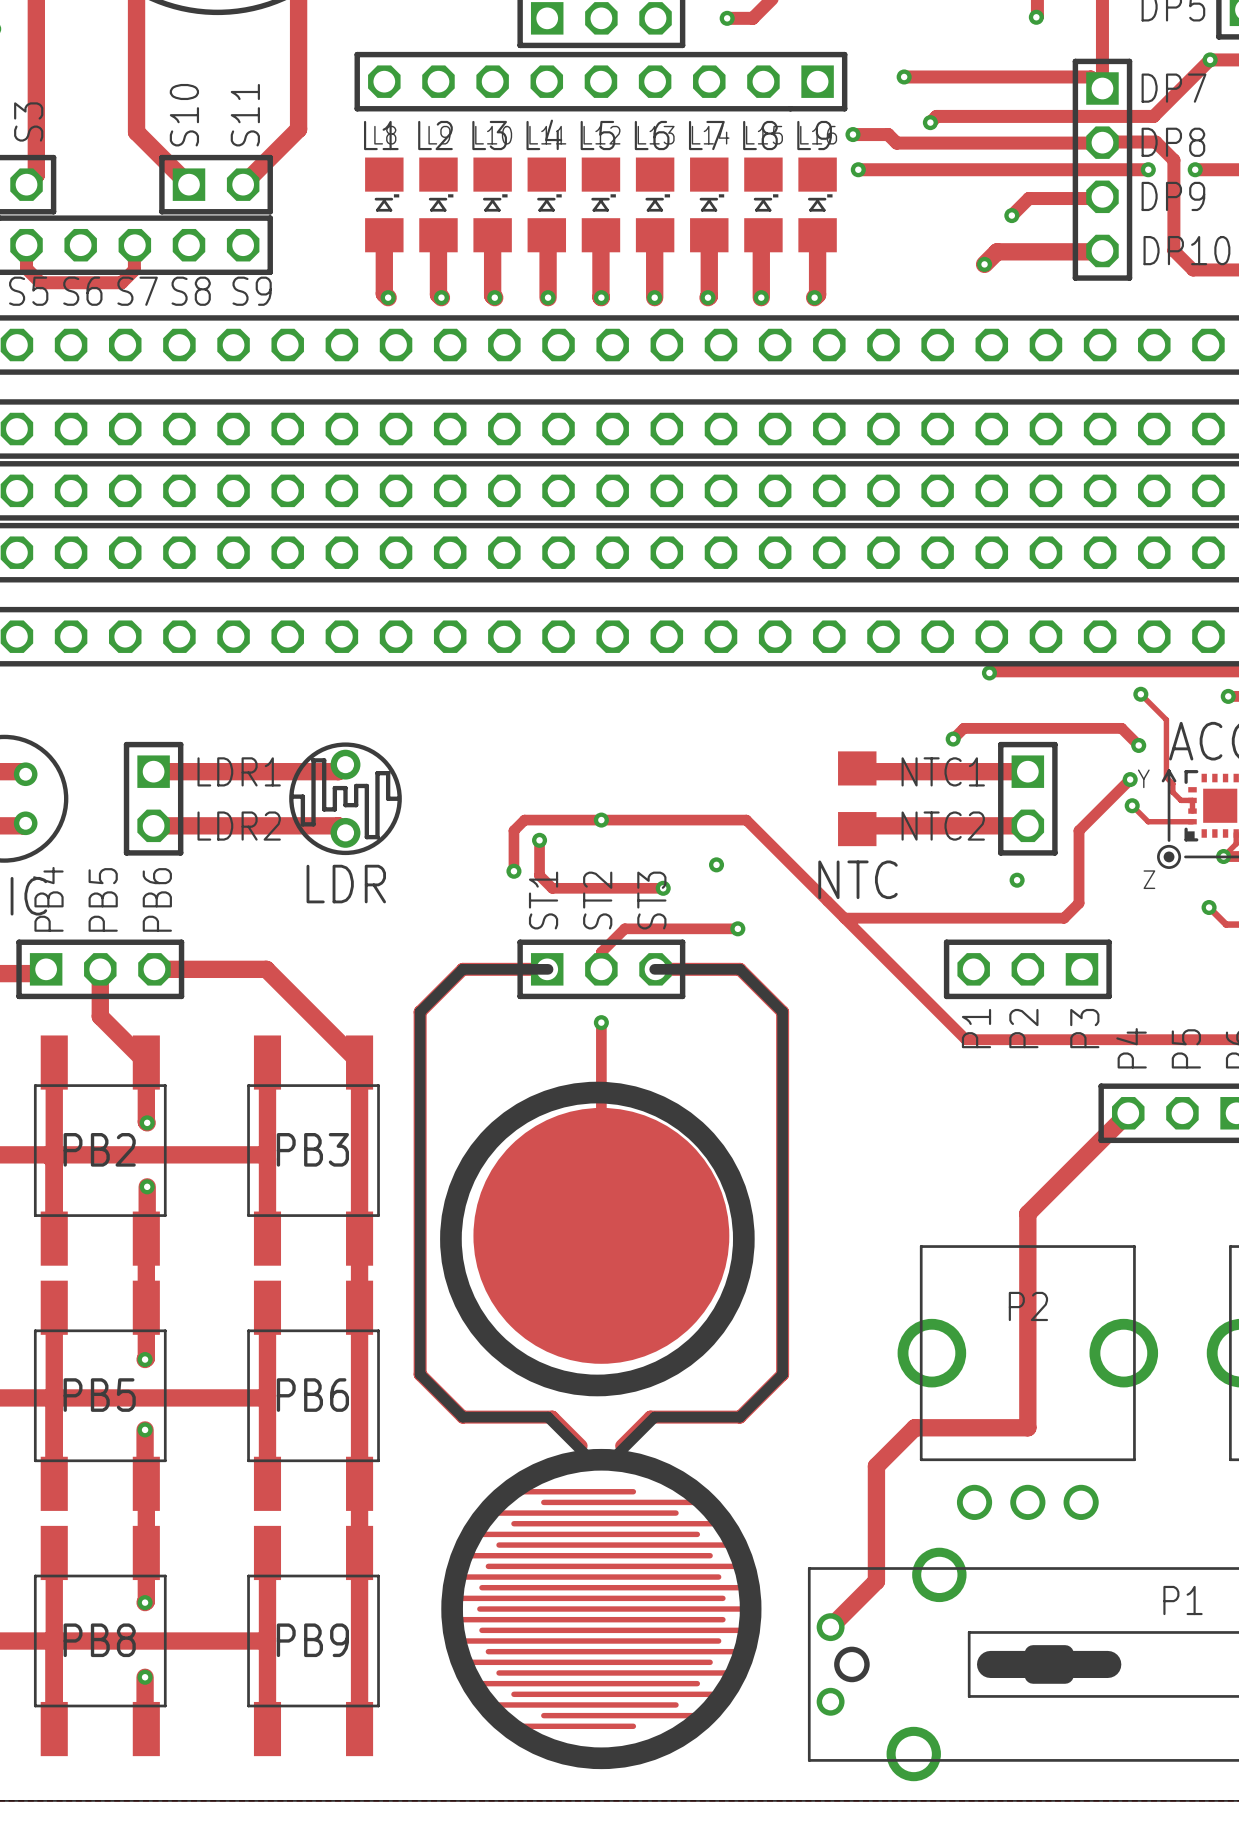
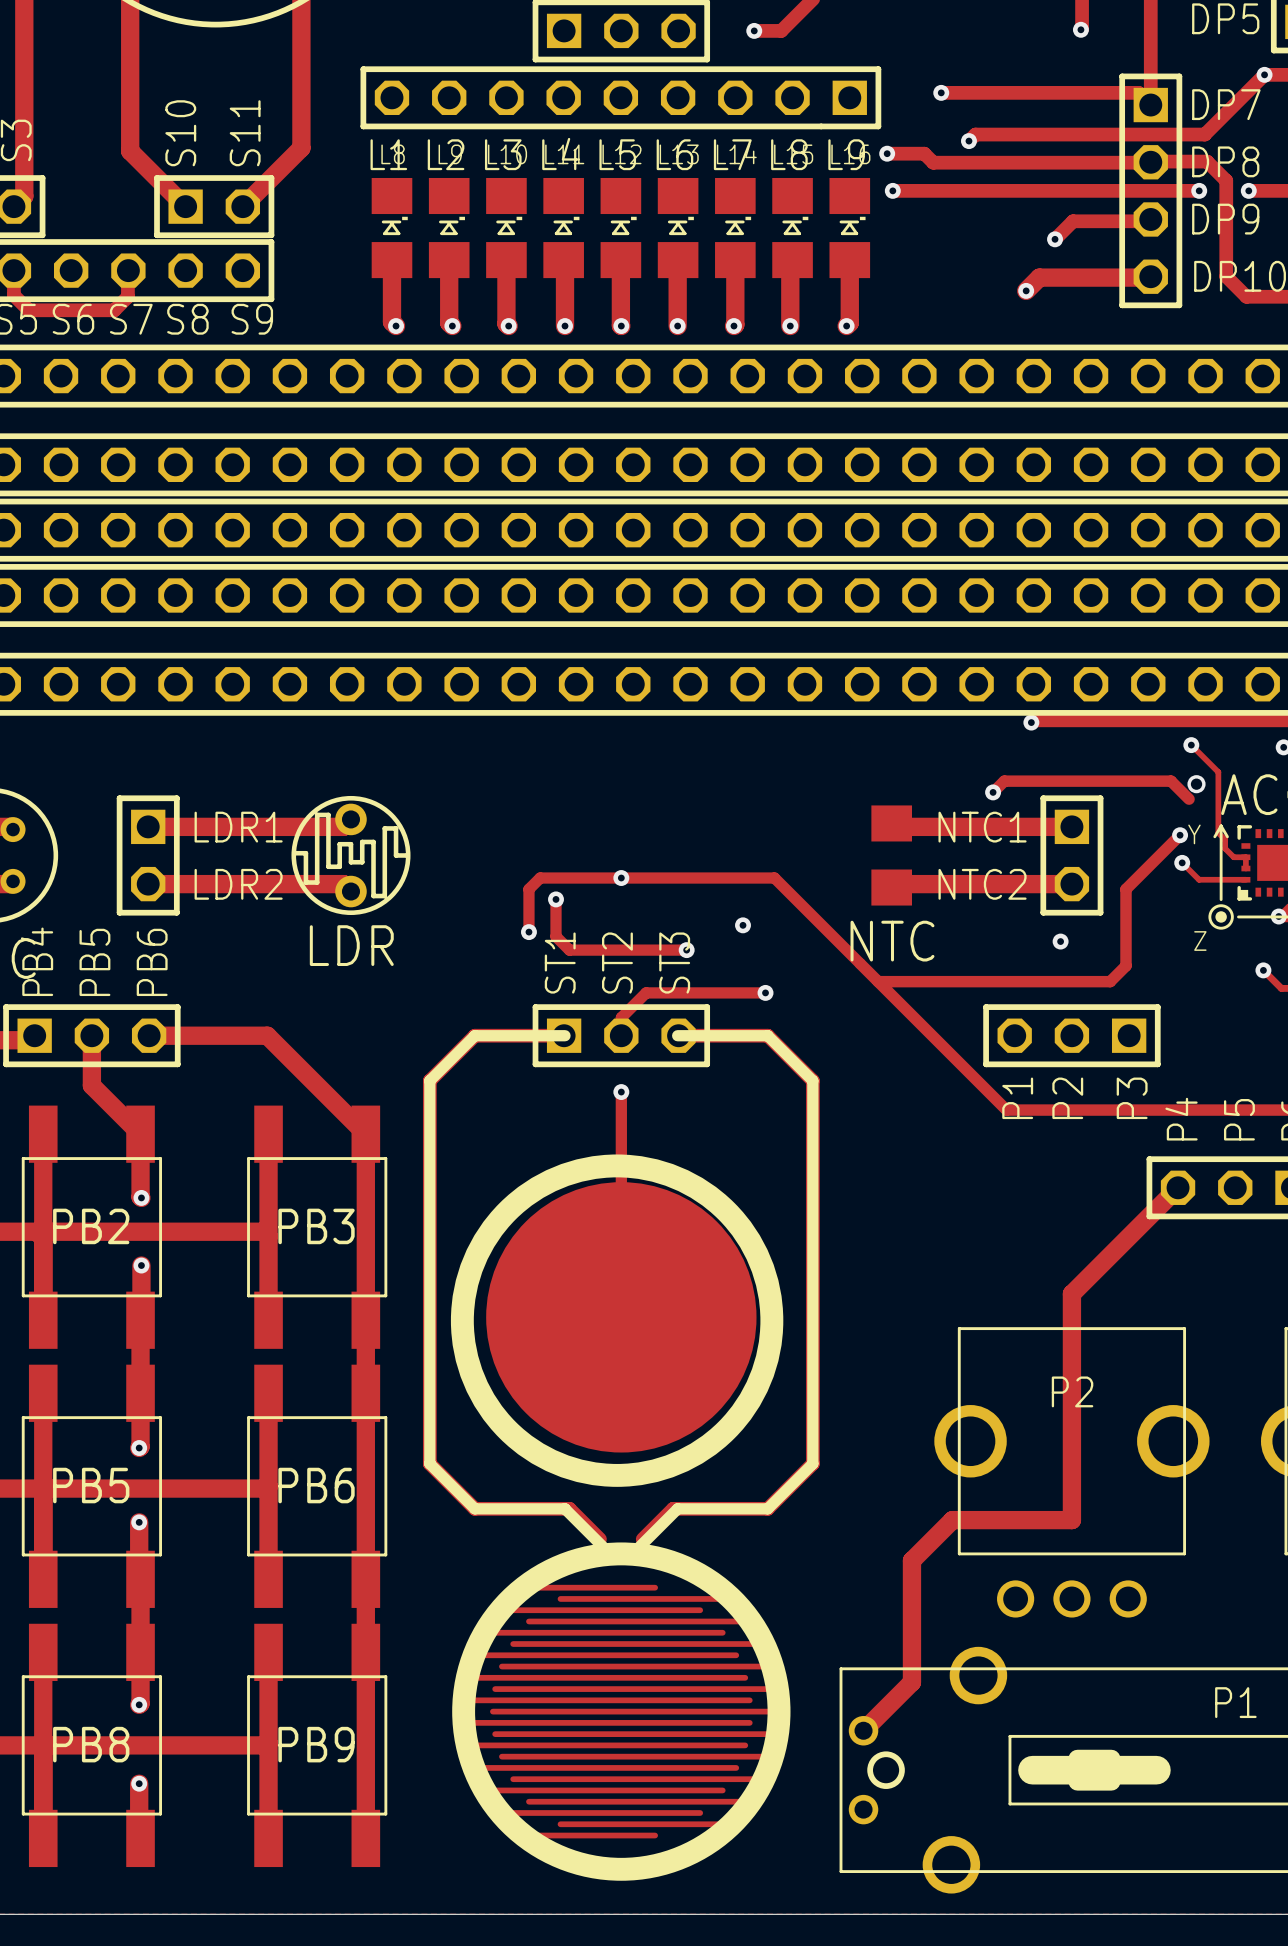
via position: (1138, 745) -> (1196, 784)

